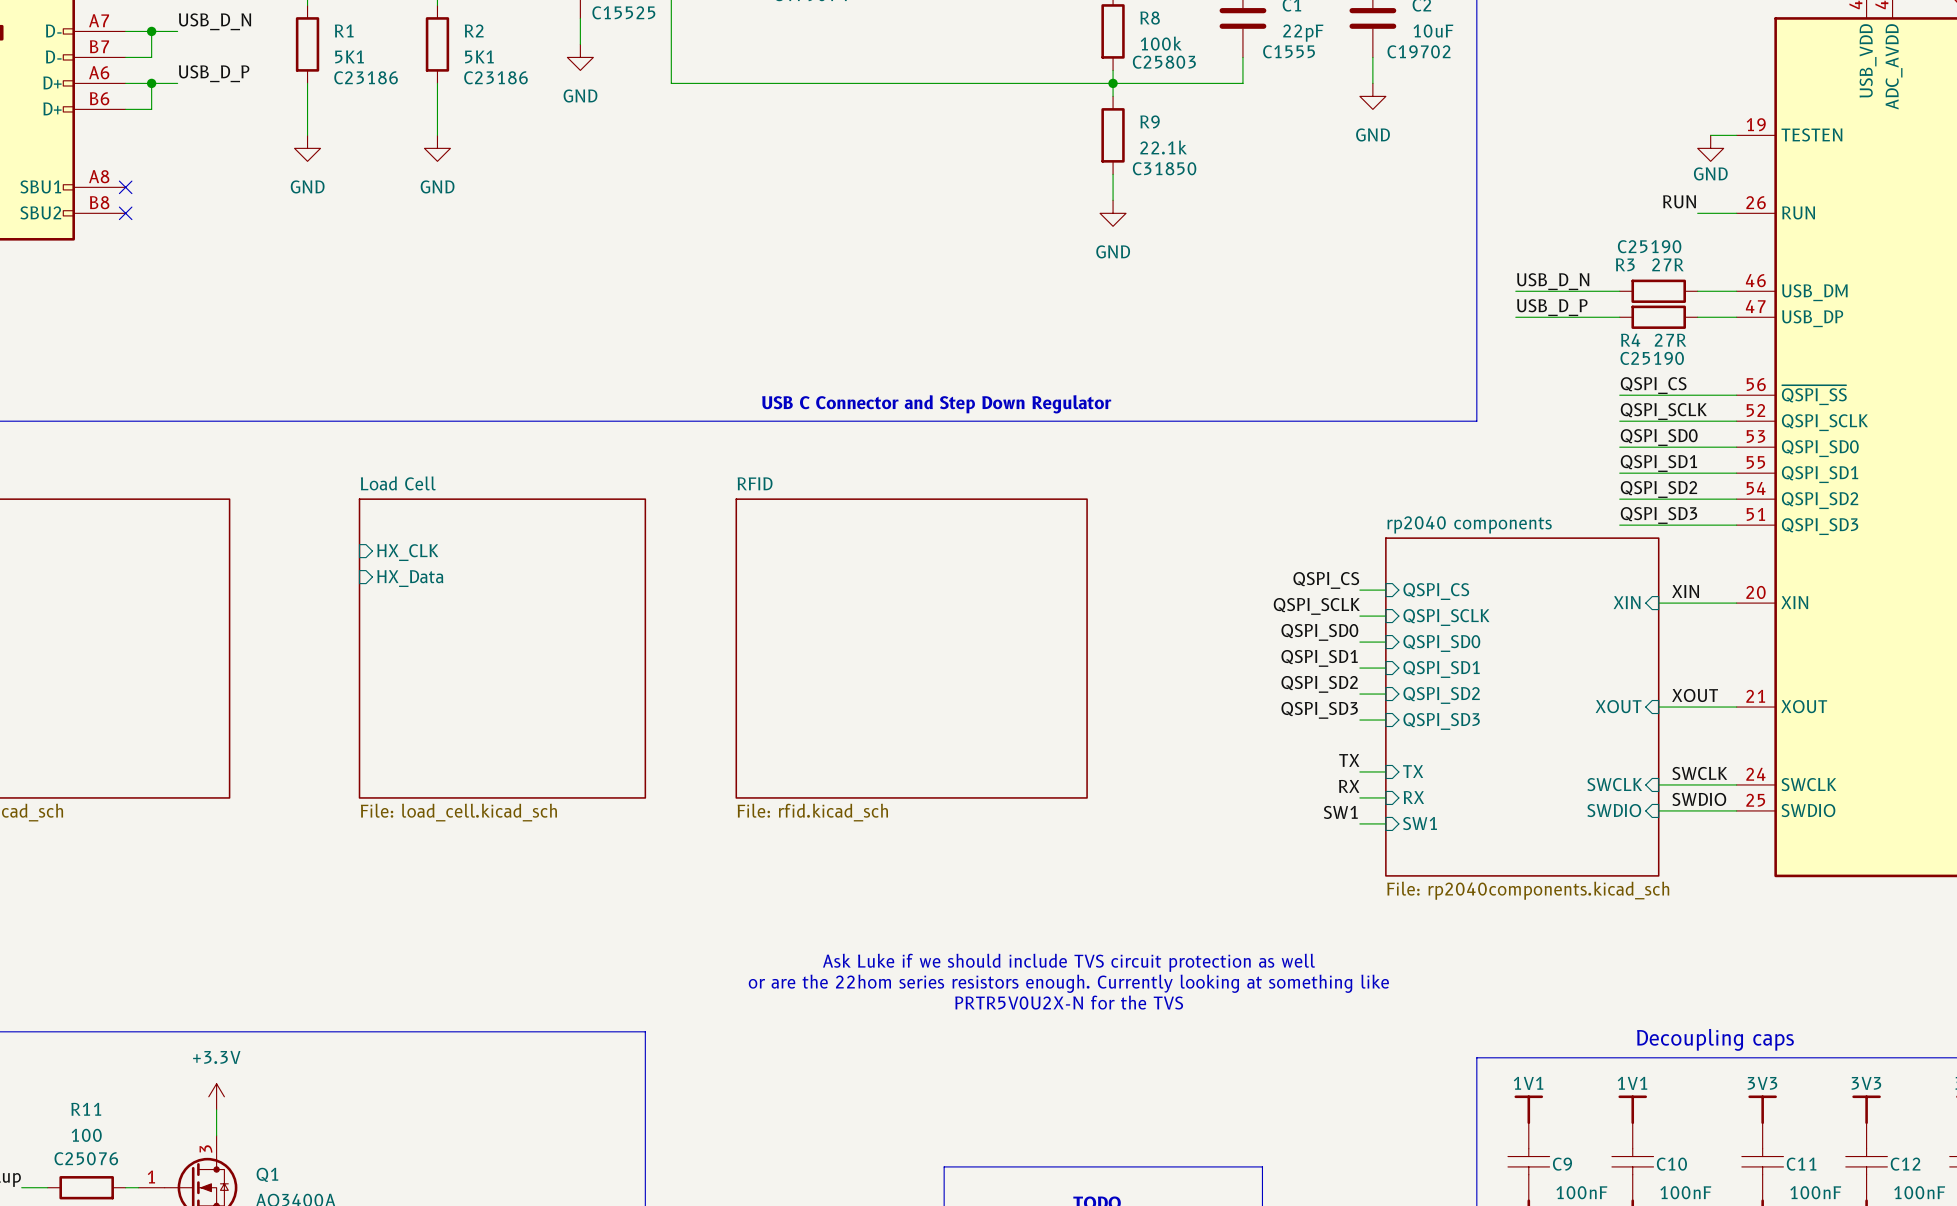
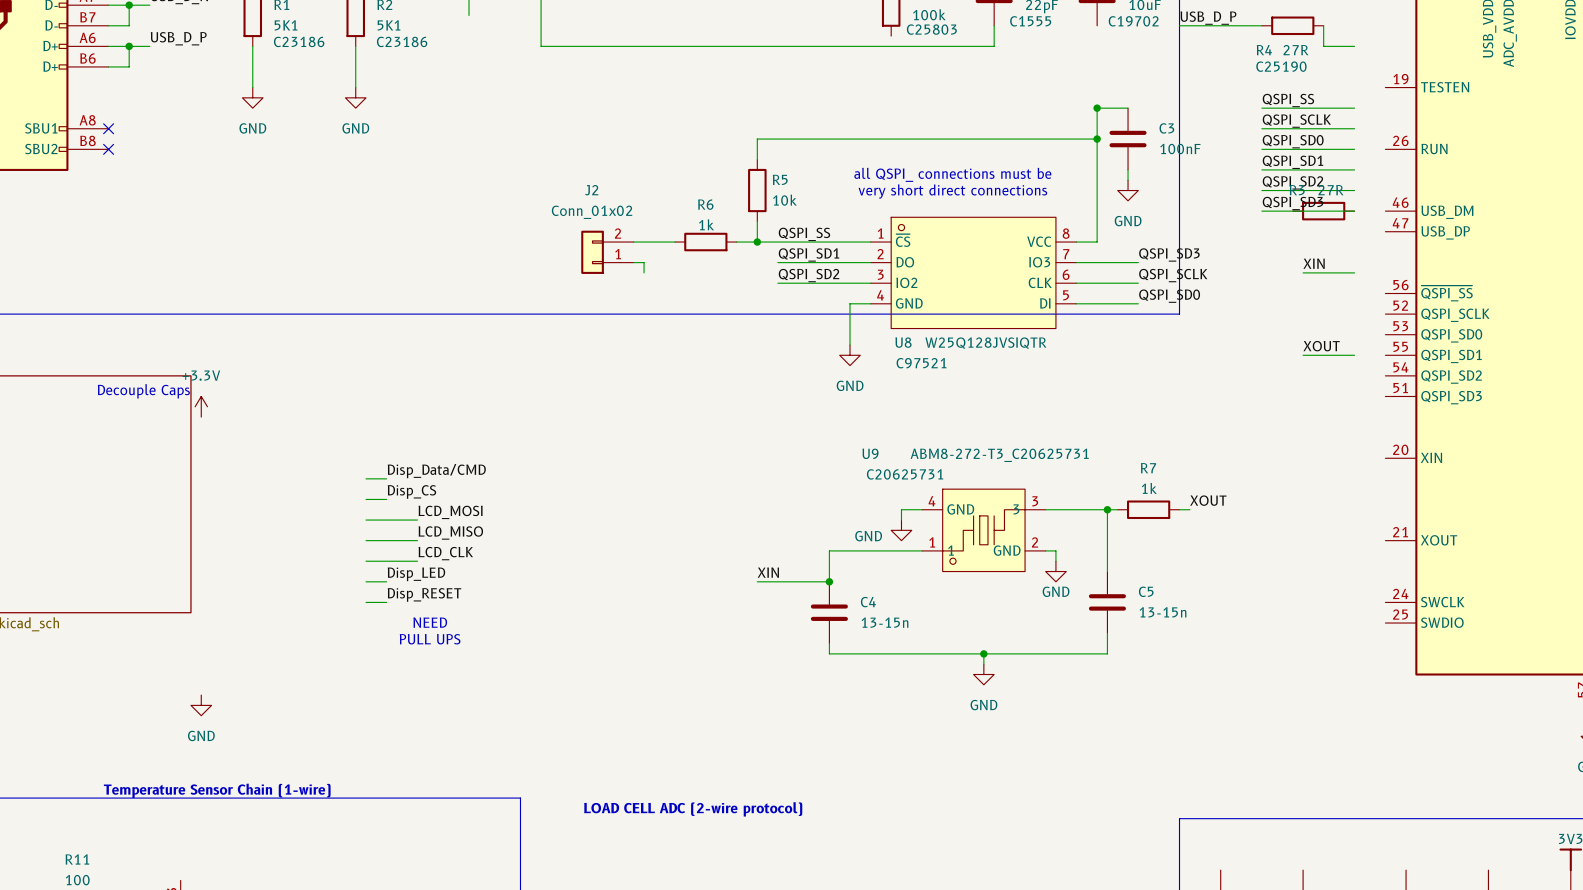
label: none -> USB_D_P (1208, 18)
power symbol: GND (580, 57) -> none
wire: (1372, 57) (1372, 83) -> none
wire: none -> (1179, 25) (1261, 25)
wire: none -> (1323, 25) (1323, 46) (1354, 46)
wire: (1113, 70) (1113, 96) -> none
junction: (1113, 83) -> none
power symbol: GND (1372, 96) -> none
R4 text: none -> C25190 (1281, 66)
R9: 22.1k (1113, 135) -> none
wire: (1710, 135) (1736, 135) -> none
power symbol: GND (1710, 148) -> none
label: none -> QSPI_SS (1288, 100)
junction: none -> (1097, 108)
wire: none -> (1128, 108) (1097, 108) (1097, 242) (1076, 242)
wire: (1113, 174) (1113, 200) -> (757, 221) (757, 242)
label: none -> QSPI_SCLK (1296, 121)
wire: none -> (1097, 139) (757, 139) (757, 159)
junction: none -> (1097, 139)
C3: none -> 100nF (1128, 139)
label: RUN (1679, 201) -> none
label: none -> QSPI_SD0 (1293, 141)
power symbol: GND (1113, 213) -> none
wire: (1697, 213) (1736, 213) -> (1354, 149) (1261, 149)
wire: none -> (1128, 169) (1128, 180)
text: none -> all QSPI_ connections must be (952, 174)
R3 text: C25190 (1649, 246) -> none
R5: none -> 10k (757, 190)
power symbol: none -> GND (1128, 190)
text: none -> very short direct connections (952, 191)
label: USB_D_N (1553, 281) -> none
label: none -> QSPI_SD3 (1292, 203)
wire: (1515, 291) (1580, 291) -> (1303, 272) (1354, 272)
wire: (1697, 291) (1736, 291) -> (1354, 211) (1292, 211)
label: USB_D_P (1552, 307) -> none
wire: (1515, 317) (1619, 317) -> none
R4 position: (1658, 317) -> (1292, 25)
wire: (1697, 317) (1736, 317) -> none
label: none -> QSPI_SS (804, 234)
wire: none -> (633, 242) (674, 242)
R6: none -> 1k (705, 242)
wire: none -> (736, 242) (870, 242)
junction: none -> (757, 242)
R4 name position: R4 (1630, 340) -> R4 (1264, 50)
R4 value position: 27R (1670, 340) -> 27R (1295, 50)
J2: none -> Conn_01x02 (607, 252)
label: none -> QSPI_SD1 (808, 254)
label: none -> QSPI_SD3 (1169, 254)
wire: none -> (633, 262) (644, 262) (644, 272)
wire: none -> (777, 262) (870, 262)
wire: none -> (1076, 262) (1138, 262)
R4 text: C25190 (1652, 358) -> none
U8: none -> W25Q128JVSIQTR (973, 272)
label: none -> QSPI_SD2 (809, 275)
label: none -> QSPI_SCLK (1173, 275)
wire: none -> (777, 283) (870, 283)
wire: none -> (1076, 283) (1138, 283)
label: QSPI_CS (1653, 385) -> none
wire: (1619, 395) (1736, 395) -> (1261, 108) (1354, 108)
label: none -> QSPI_SD0 (1169, 296)
text: USB C Connector and Step Down Regulator (936, 404) -> none
wire: none -> (870, 303) (850, 303) (850, 344)
wire: none -> (1076, 303) (1138, 303)
label: QSPI_SCLK (1663, 411) -> none
wire: (1619, 421) (1736, 421) -> (1261, 128) (1354, 128)
label: QSPI_SD0 (1659, 437) -> none
wire: (1619, 447) (1736, 447) -> (1261, 169) (1354, 169)
label: none -> XOUT (1321, 346)
label position: QSPI_SD1 (1658, 463) -> QSPI_SD1 (1292, 162)
power symbol: none -> GND (850, 355)
wire: (1619, 473) (1632, 473) -> (1179, 509) (1189, 509)
wire: (1697, 473) (1736, 473) -> none
label position: QSPI_SD2 (1658, 489) -> QSPI_SD2 (1292, 182)
wire: (1619, 499) (1736, 499) -> (1261, 190) (1354, 190)
label: QSPI_SD3 (1658, 515) -> none
text: none -> Decouple Caps (143, 391)
wire: (1619, 525) (1736, 525) -> none
power symbol: none -> +3.3V (201, 406)
sheet pin: HX_CLK (407, 552) -> none
sheet pin: HX_Data (410, 578) -> none
label: QSPI_CS (1326, 580) -> none
wire: (1359, 590) (1385, 590) -> none
sheet pin: QSPI_CS (1436, 591) -> none
label position: XIN (1685, 591) -> XIN (1314, 263)
sheet pin: XIN (1627, 602) -> none
wire: (1658, 603) (1736, 603) -> none
label: QSPI_SCLK (1316, 606) -> none
wire: (1359, 616) (1385, 616) -> none
sheet pin: QSPI_SCLK (1446, 617) -> none
label: none -> Disp_Data/CMD (436, 471)
wire: none -> (366, 478) (386, 478)
label: QSPI_SD0 (1319, 632) -> none
wire: (1359, 642) (1385, 642) -> none
sheet pin: QSPI_SD0 (1441, 643) -> none
label: none -> Disp_CS (411, 491)
sheet Load Cell: File: load_cell.kicad_sch (502, 648) -> none
sheet RFID: File: rfid.kicad_sch (911, 648) -> none
wire: none -> (366, 499) (386, 499)
label: none -> XOUT (1208, 500)
label: QSPI_SD1 (1319, 658) -> none
wire: none -> (922, 509) (901, 509) (901, 520)
wire: none -> (1045, 509) (1086, 509)
junction: none -> (1107, 509)
R7: none -> 1k (1148, 509)
sheet pin: QSPI_SD1 (1441, 669) -> none
label: none -> LCD_MOSI (450, 512)
wire: none -> (366, 520) (417, 520)
label: QSPI_SD2 (1319, 684) -> none
power symbol: none -> GND (901, 530)
U9: none -> ABM8-272-T3_C20625731 (983, 530)
wire: (1359, 694) (1385, 694) -> none
sheet pin: QSPI_SD2 (1441, 695) -> none
label: XOUT (1695, 695) -> none
label: none -> LCD_MISO (450, 532)
sheet pin: XOUT (1618, 706) -> none
wire: none -> (366, 540) (417, 540)
sheet rp2040 components: File: rp2040components.kicad_sch (1522, 707) -> none
wire: (1658, 707) (1736, 707) -> none
label: QSPI_SD3 (1319, 710) -> none
wire: none -> (922, 550) (829, 550) (829, 581) (757, 581)
wire: none -> (1045, 550) (1055, 550) (1055, 561)
wire: (1359, 720) (1385, 720) -> none
sheet pin: QSPI_SD3 (1441, 721) -> none
label: none -> LCD_CLK (445, 553)
wire: none -> (366, 561) (417, 561)
power symbol: none -> GND (1055, 571)
label: none -> XIN (768, 572)
label: none -> Disp_LED (416, 574)
wire: none -> (366, 581) (386, 581)
junction: none -> (829, 581)
label: TX (1349, 760) -> none
wire: (1359, 771) (1385, 771) -> none
sheet pin: TX (1413, 771) -> none
label: SWCLK (1699, 773) -> none
label: none -> Disp_RESET (424, 594)
wire: none -> (366, 602) (386, 602)
C5: none -> 13-15n (1107, 602)
sheet pin: SWCLK (1614, 784) -> none
wire: (1658, 784) (1736, 784) -> none
label: RX (1349, 786) -> none
C4: none -> 13-15n (829, 612)
wire: (1359, 797) (1385, 797) -> none
sheet pin: RX (1413, 797) -> none
label: SWDIO (1699, 799) -> none
text: none -> NEED (430, 622)
sheet pin: SWDIO (1614, 810) -> none
wire: (1658, 810) (1736, 810) -> none
label: SW1 (1340, 812) -> none
wire: (1359, 823) (1385, 823) -> (829, 643) (829, 653) (1107, 653) (1107, 633)
sheet pin: SW1 (1420, 823) -> none
text: none -> PULL UPS (430, 639)
wire: none -> (983, 653) (983, 664)
junction: none -> (983, 653)
power symbol: none -> GND (983, 674)
power symbol: none -> GND (201, 705)
text: Ask Luke if we should include TVS circuit protection as well (1069, 962) -> none
text: or are the 22hom series resistors enough. Currently looking at something like (1068, 983) -> none
text: PRTR5V0U2X-N for the TVS (1069, 1002) -> none
text: none -> Temperature Sensor Chain (1-wire) (217, 790)
text: Decoupling caps (1715, 1039) -> none
text: none -> LOAD CELL ADC (2-wire protocol) (693, 809)
power symbol: +3.3V (216, 1096) -> none
wire: (216, 1109) (216, 1135) -> none
power symbol: 1V1 (1528, 1109) -> none
power symbol: 1V1 (1632, 1109) -> none
power symbol: 3V3 (1762, 1109) -> none
power symbol: 3V3 (1866, 1109) -> none

